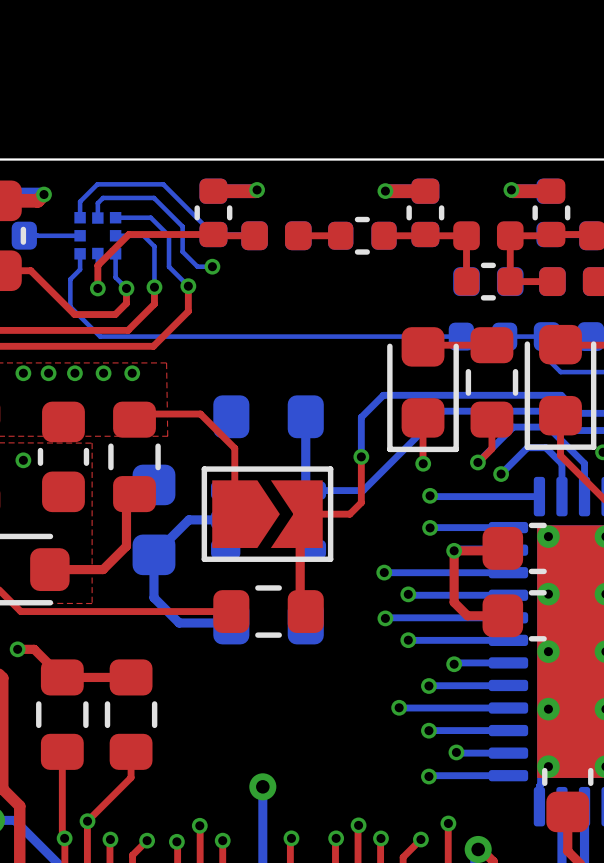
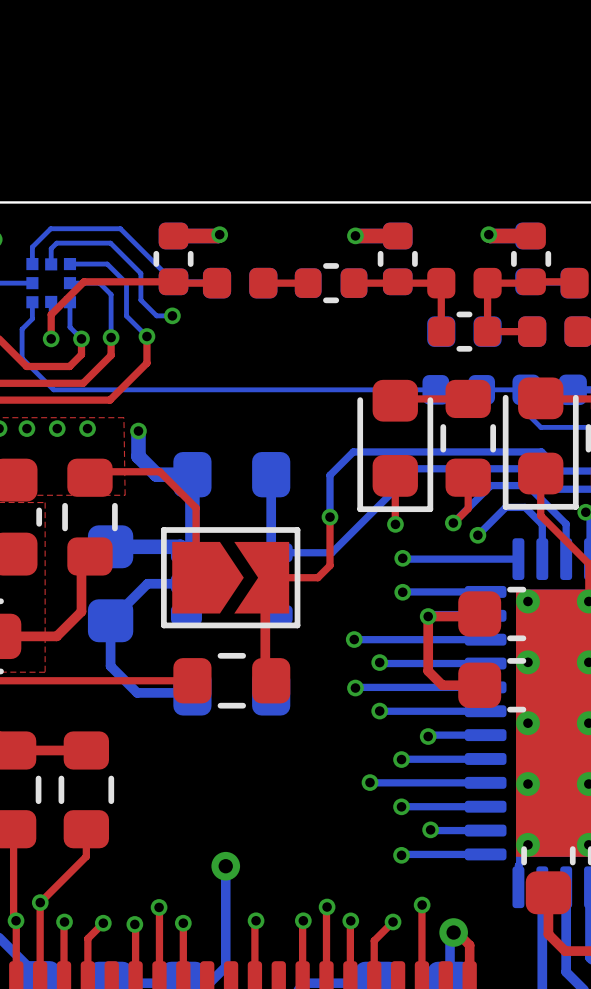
bottom track: none -> (138, 431) (138, 456) (156, 474) (192, 474) (192, 546) (186, 552) (180, 546) (110, 546)
via: none -> (138, 431)

